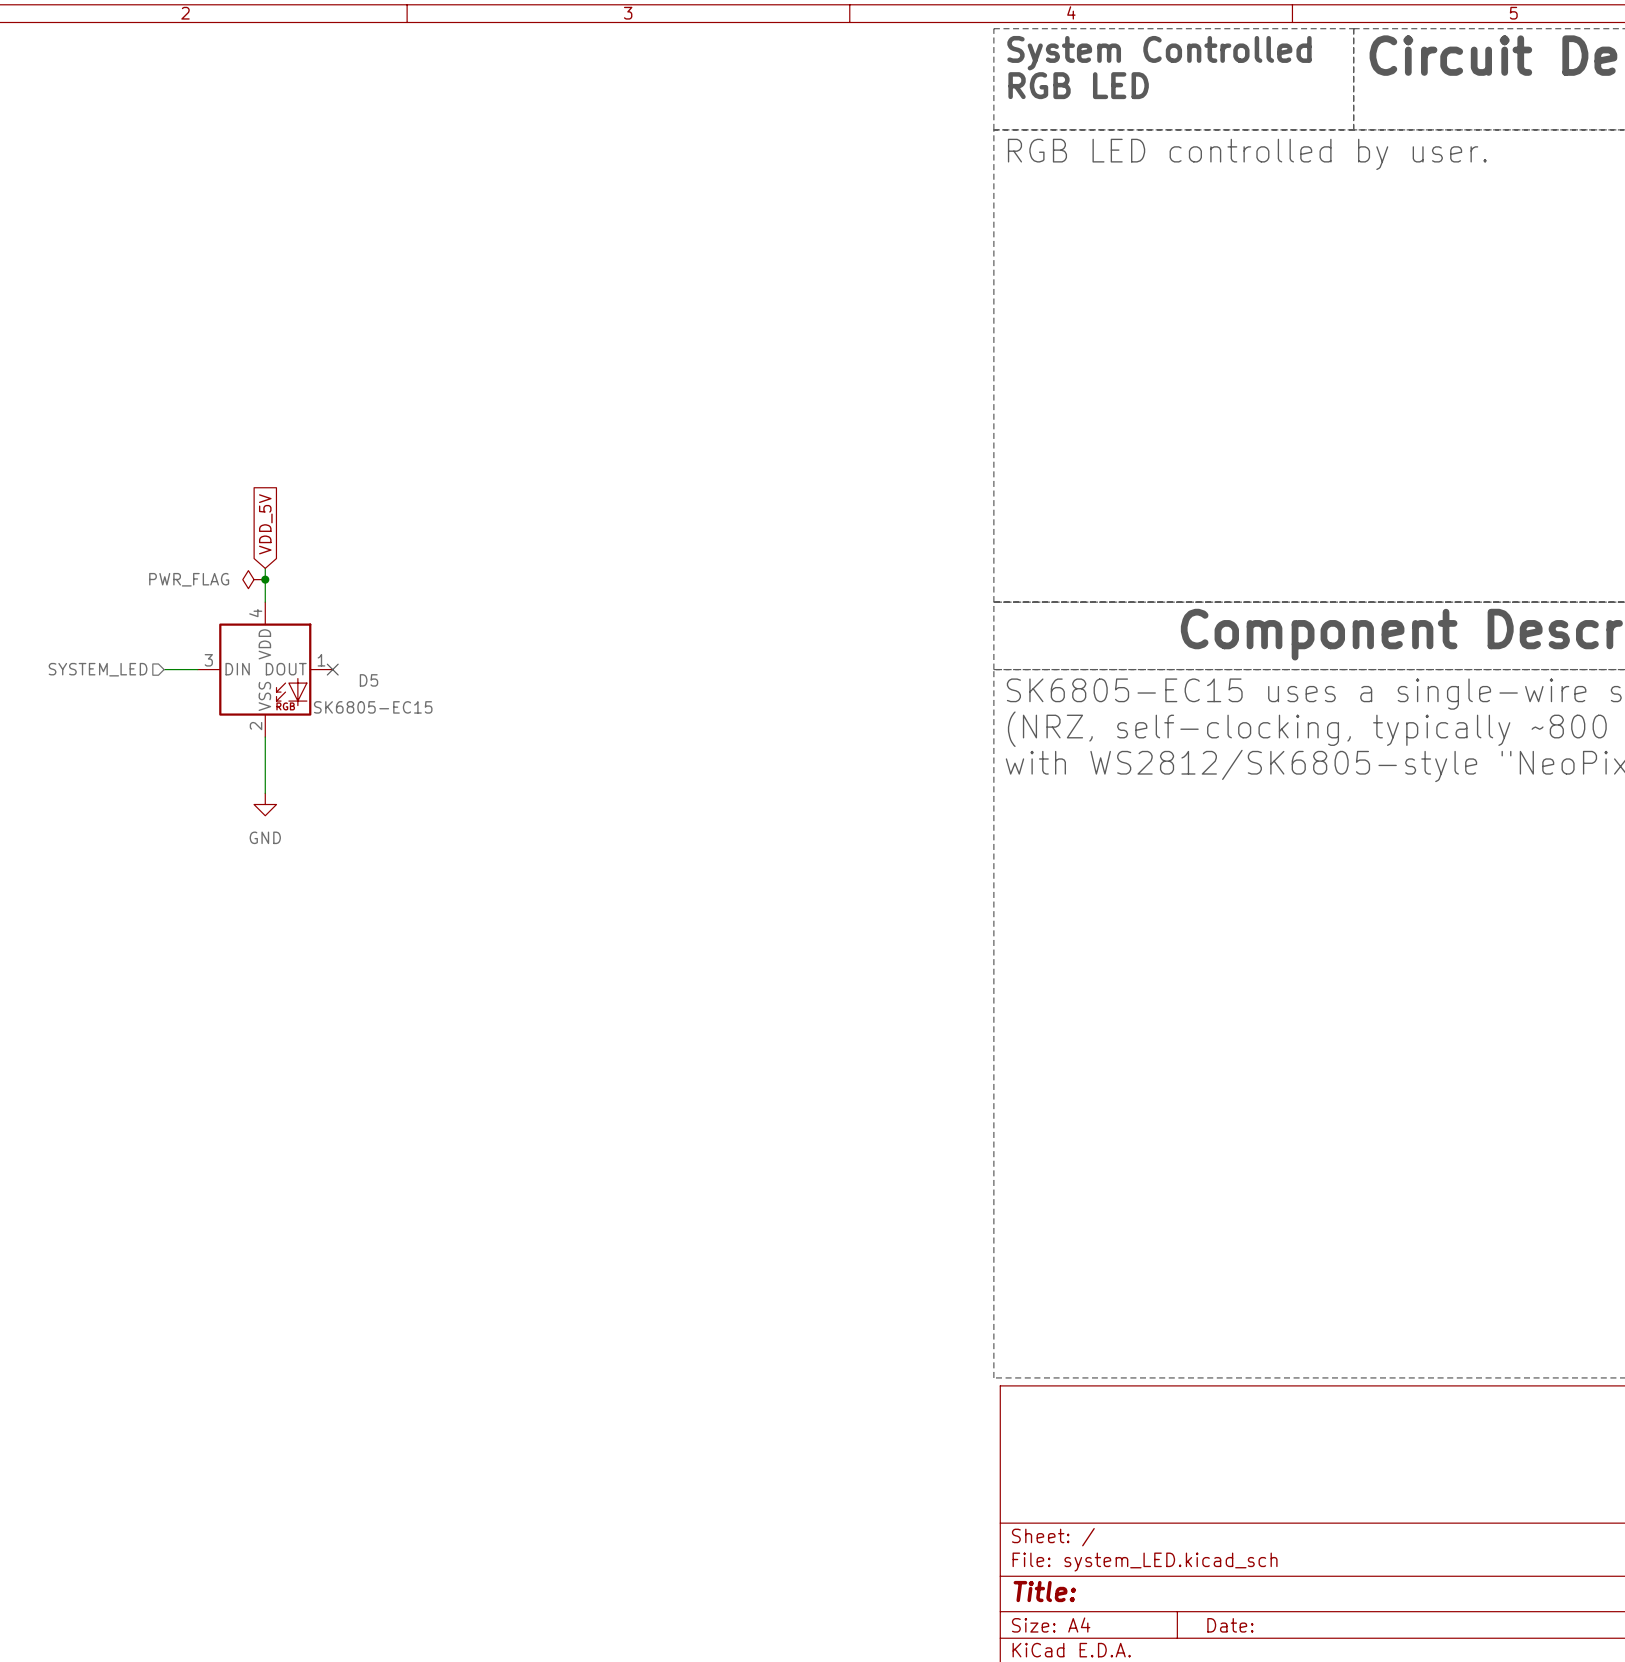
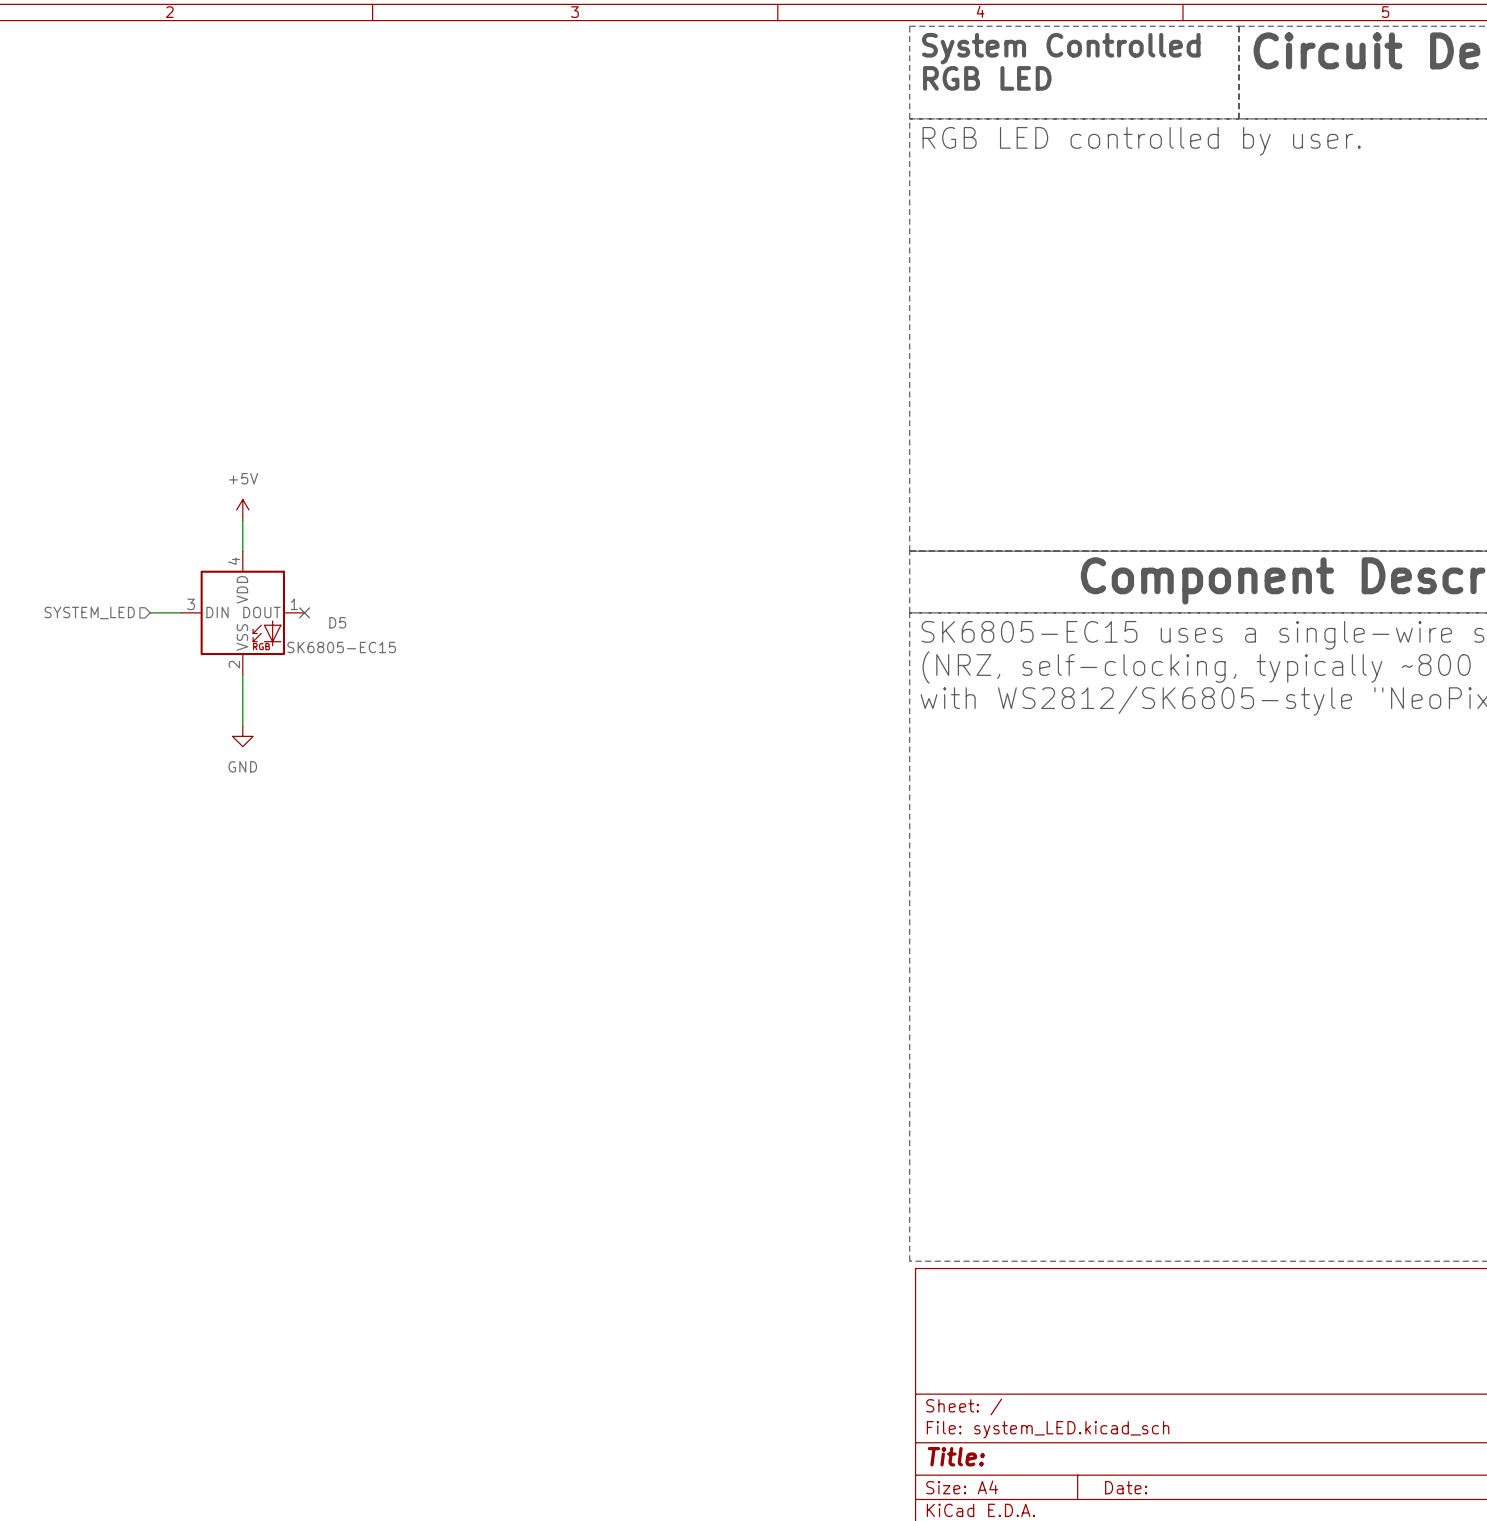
global label: VDD_5V (265, 524) -> none
power symbol: none -> +5V (242, 509)
power symbol: PWR_FLAG (254, 579) -> none
junction: (265, 579) -> none

